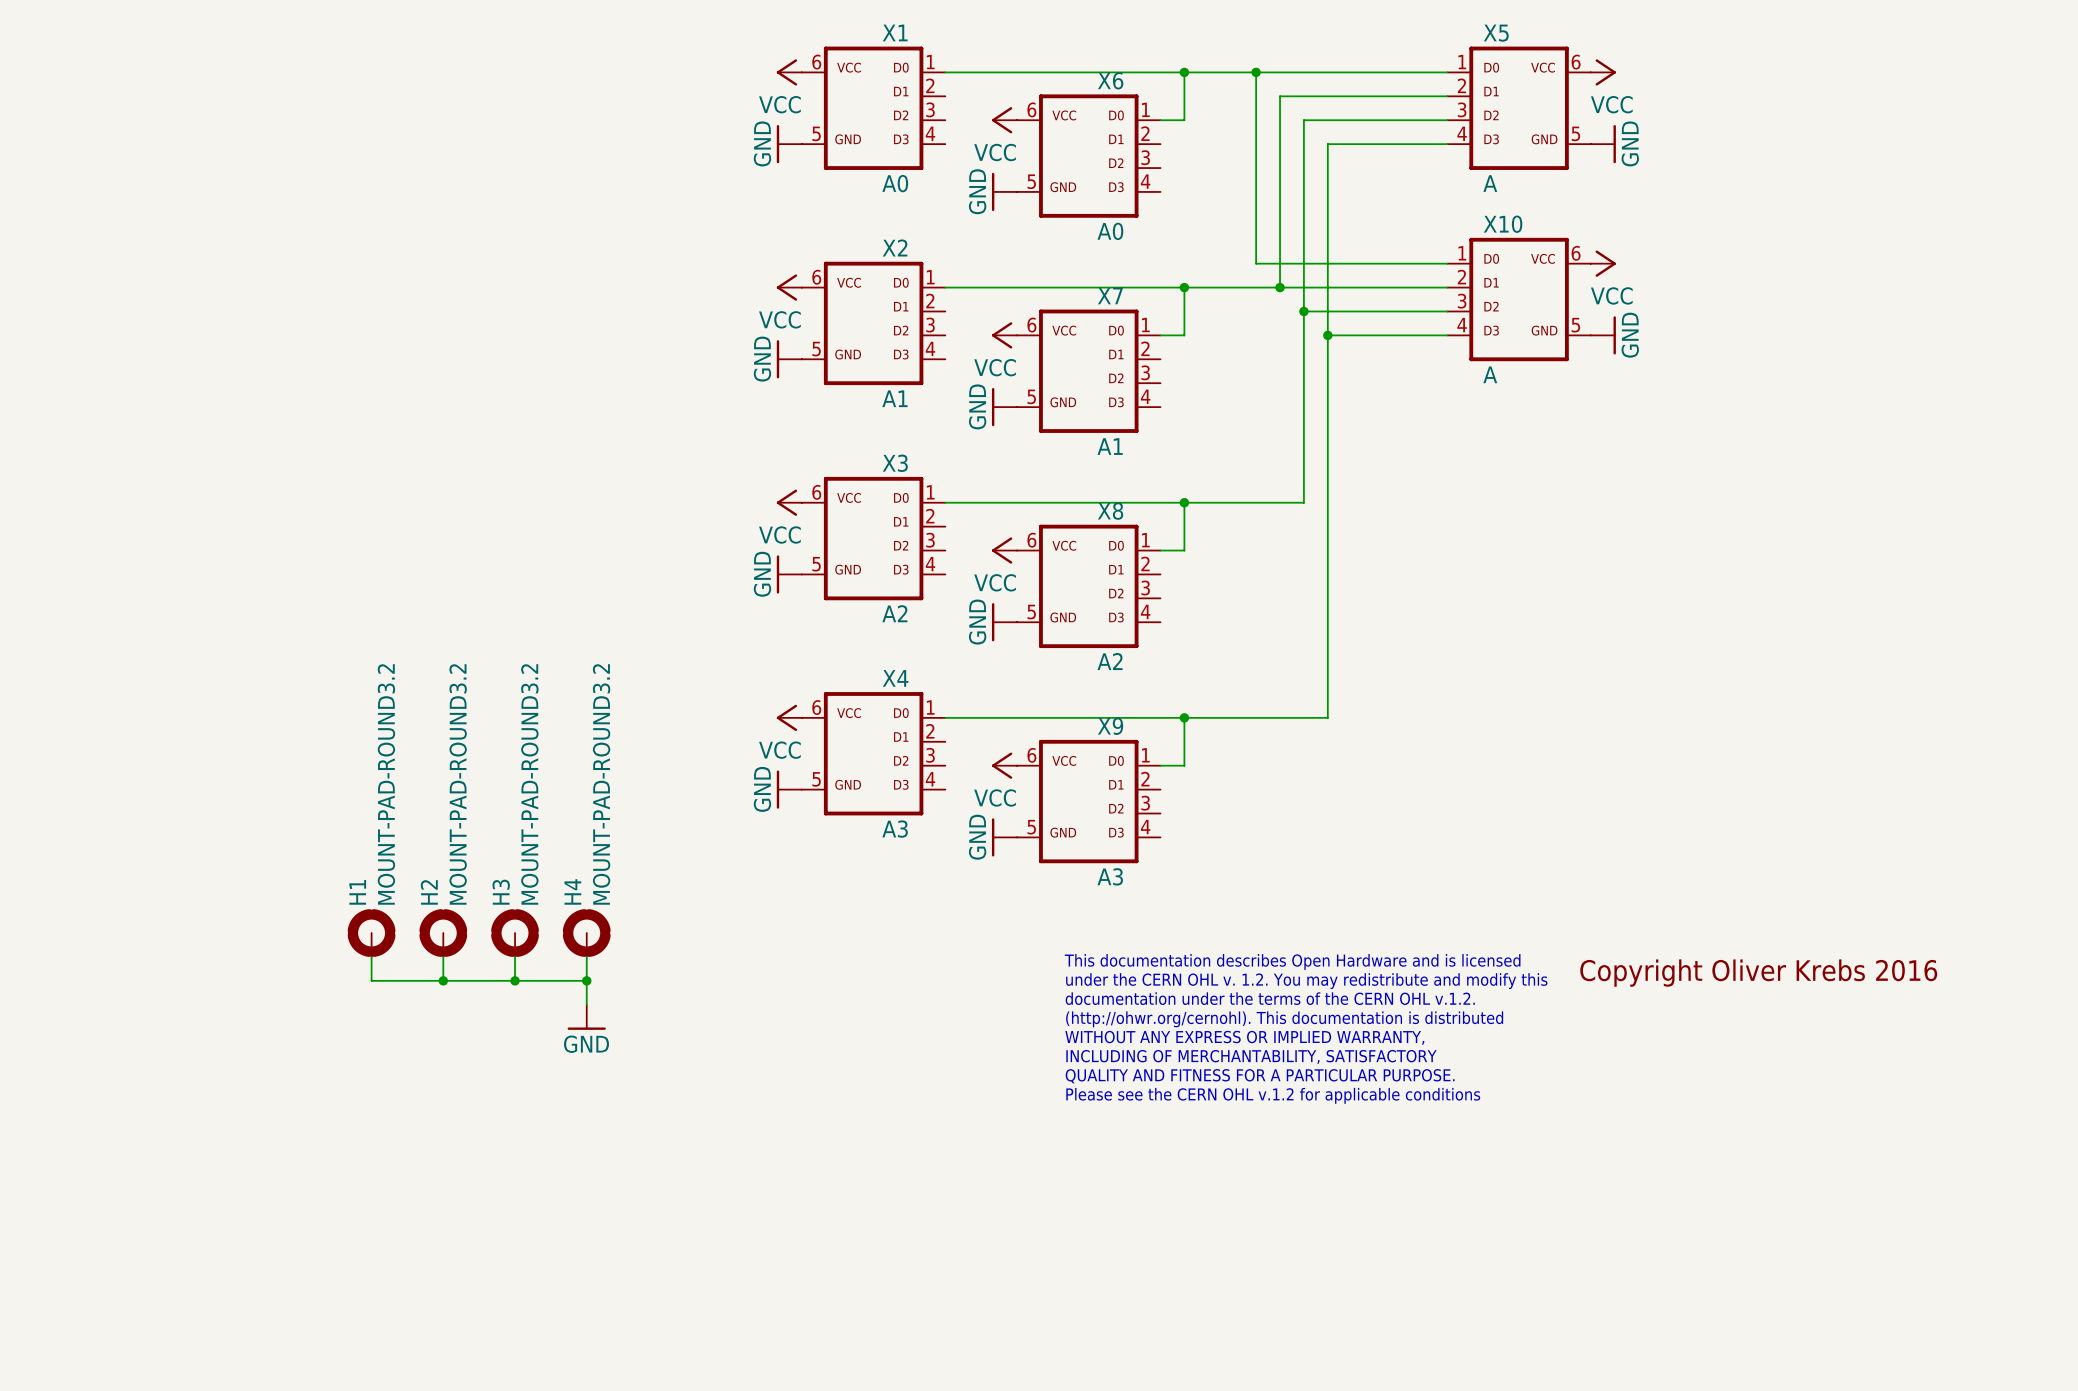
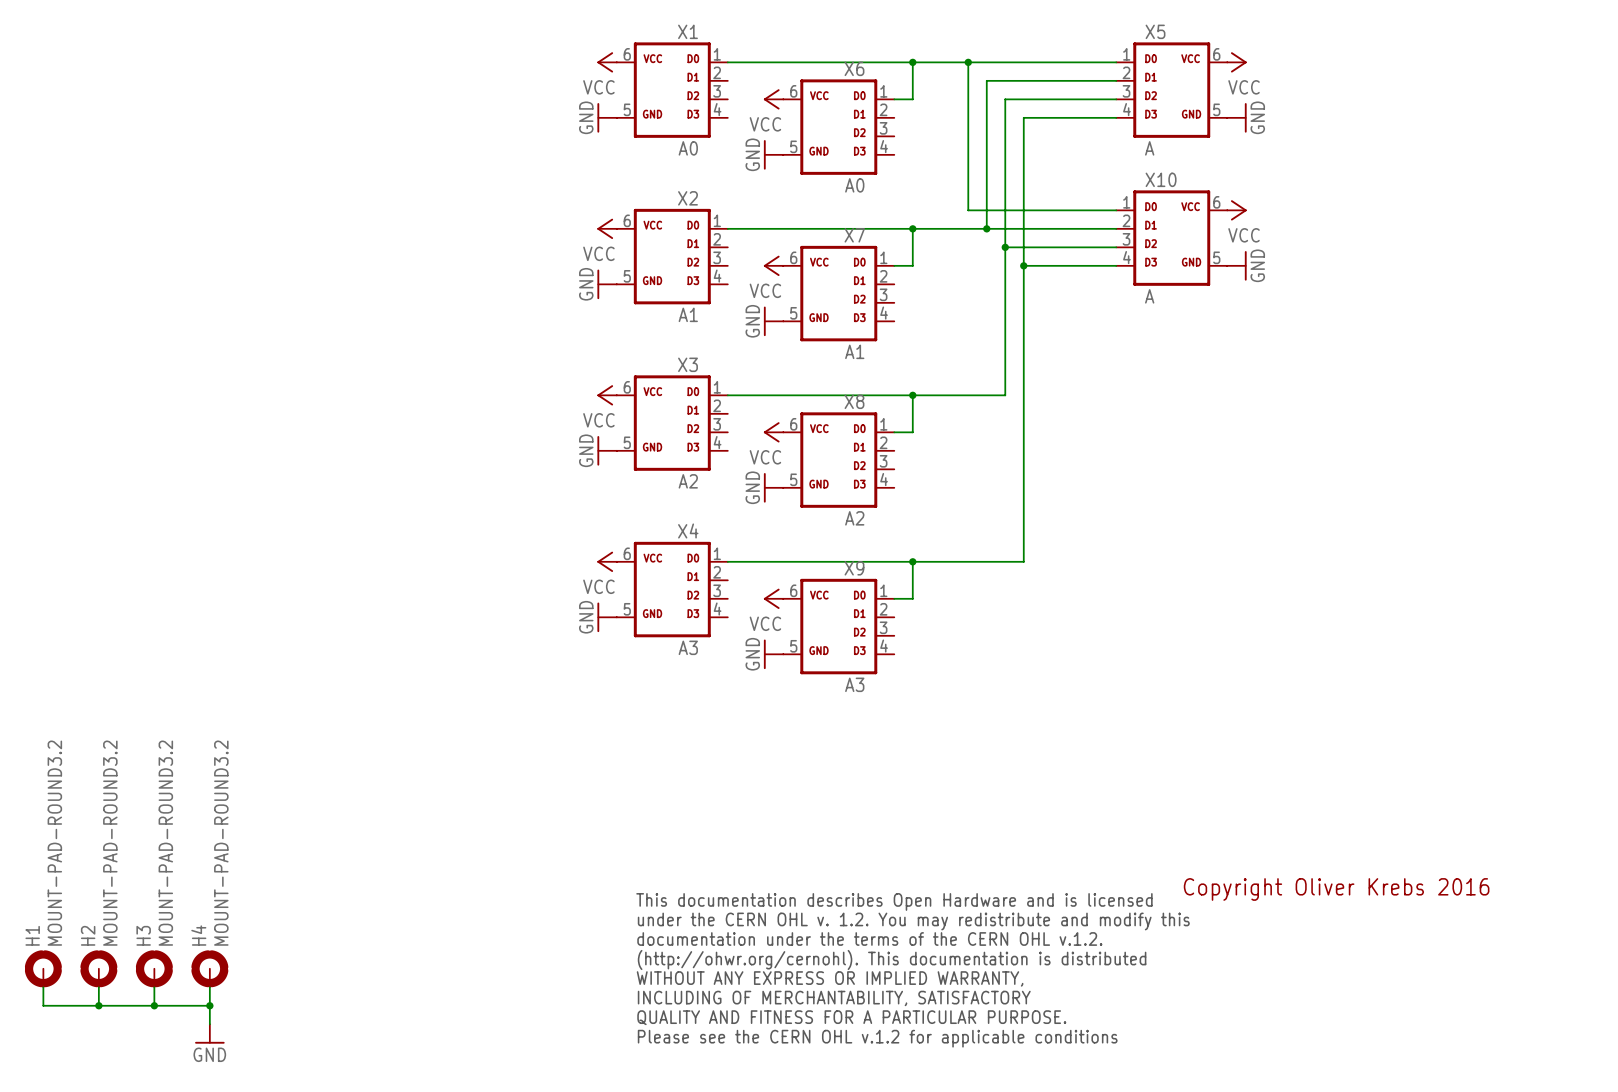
H1 position: (371, 933) -> (43, 968)
H2 position: (443, 933) -> (98, 968)
H3 position: (515, 933) -> (154, 968)
H4 position: (586, 933) -> (209, 968)
wire: (371, 956) (371, 980) (586, 980) -> none
wire: (443, 956) (443, 980) -> none
wire: (515, 956) (515, 980) -> none
wire: (586, 956) (586, 1004) -> none
text: This documentation describes Open Hardware and is licensed (1292, 961) -> none
text position: Copyright Oliver Krebs 2016 (1758, 973) -> Copyright Oliver Krebs 2016 (1336, 889)
junction: (443, 980) -> none
junction: (515, 980) -> none
junction: (586, 980) -> none
text: under the CERN OHL v. 1.2. You may redistribute and modify this (1306, 981) -> none
text: documentation under the terms of the CERN OHL v.1.2. (1270, 998) -> none
power symbol: GND (586, 1017) -> none
text: (http://ohwr.org/cernohl). This documentation is distributed (1284, 1019) -> none
text: WITHOUT ANY EXPRESS OR IMPLIED WARRANTY, (1244, 1037) -> none
text: INCLUDING OF MERCHANTABILITY, SATISFACTORY (1251, 1057) -> none
text: QUALITY AND FITNESS FOR A PARTICULAR PURPOSE. (1260, 1076) -> none
text: Please see the CERN OHL v.1.2 for applicable conditions (1273, 1095) -> none
text: none -> This documentation describes Open Hardware and is licensed (894, 901)
text: none -> under the CERN OHL v. 1.2. You may redistribute and modify this (913, 921)
text: none -> documentation under the terms of the CERN OHL v.1.2. (869, 938)
text: none -> (http://ohwr.org/cernohl). This documentation is distributed (892, 959)
text: none -> WITHOUT ANY EXPRESS OR IMPLIED WARRANTY, (830, 978)
wire: none -> (43, 987) (43, 1005) (209, 1005)
wire: none -> (98, 987) (98, 1005)
wire: none -> (154, 987) (154, 1005)
wire: none -> (209, 987) (209, 1024)
text: none -> INCLUDING OF MERCHANTABILITY, SATISFACTORY (834, 998)
junction: none -> (98, 1005)
junction: none -> (154, 1005)
junction: none -> (209, 1005)
text: none -> QUALITY AND FITNESS FOR A PARTICULAR PURPOSE. (851, 1017)
power symbol: none -> GND (209, 1033)
text: none -> Please see the CERN OHL v.1.2 for applicable conditions (877, 1038)

